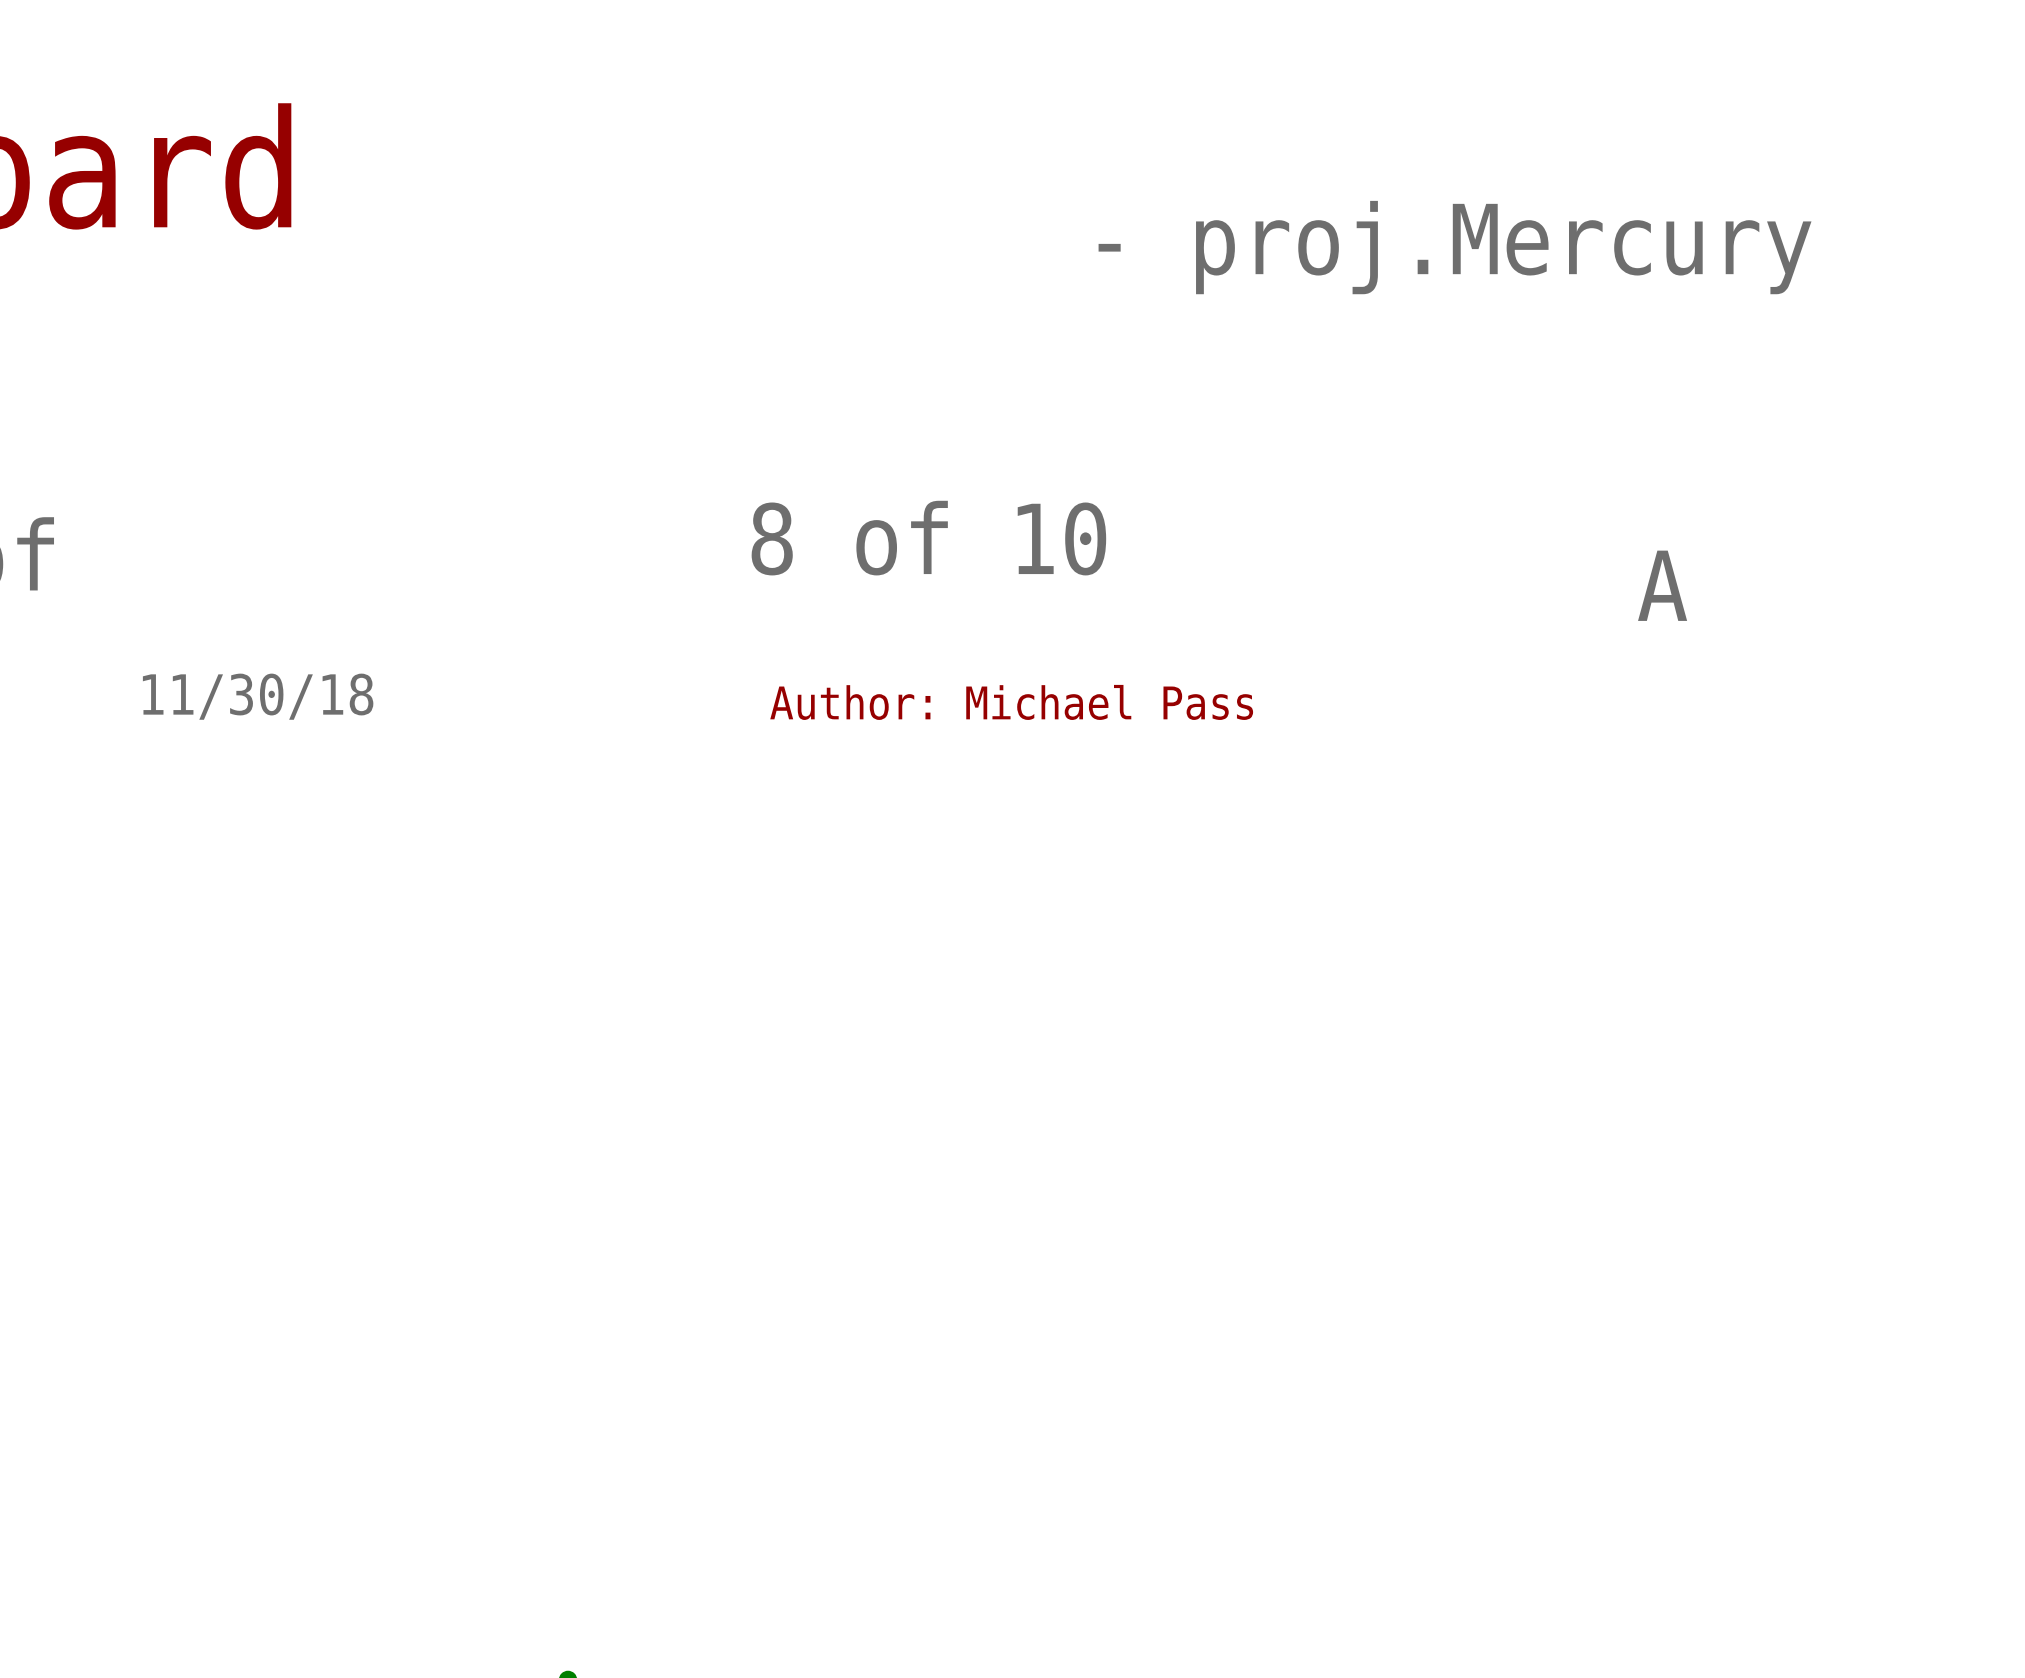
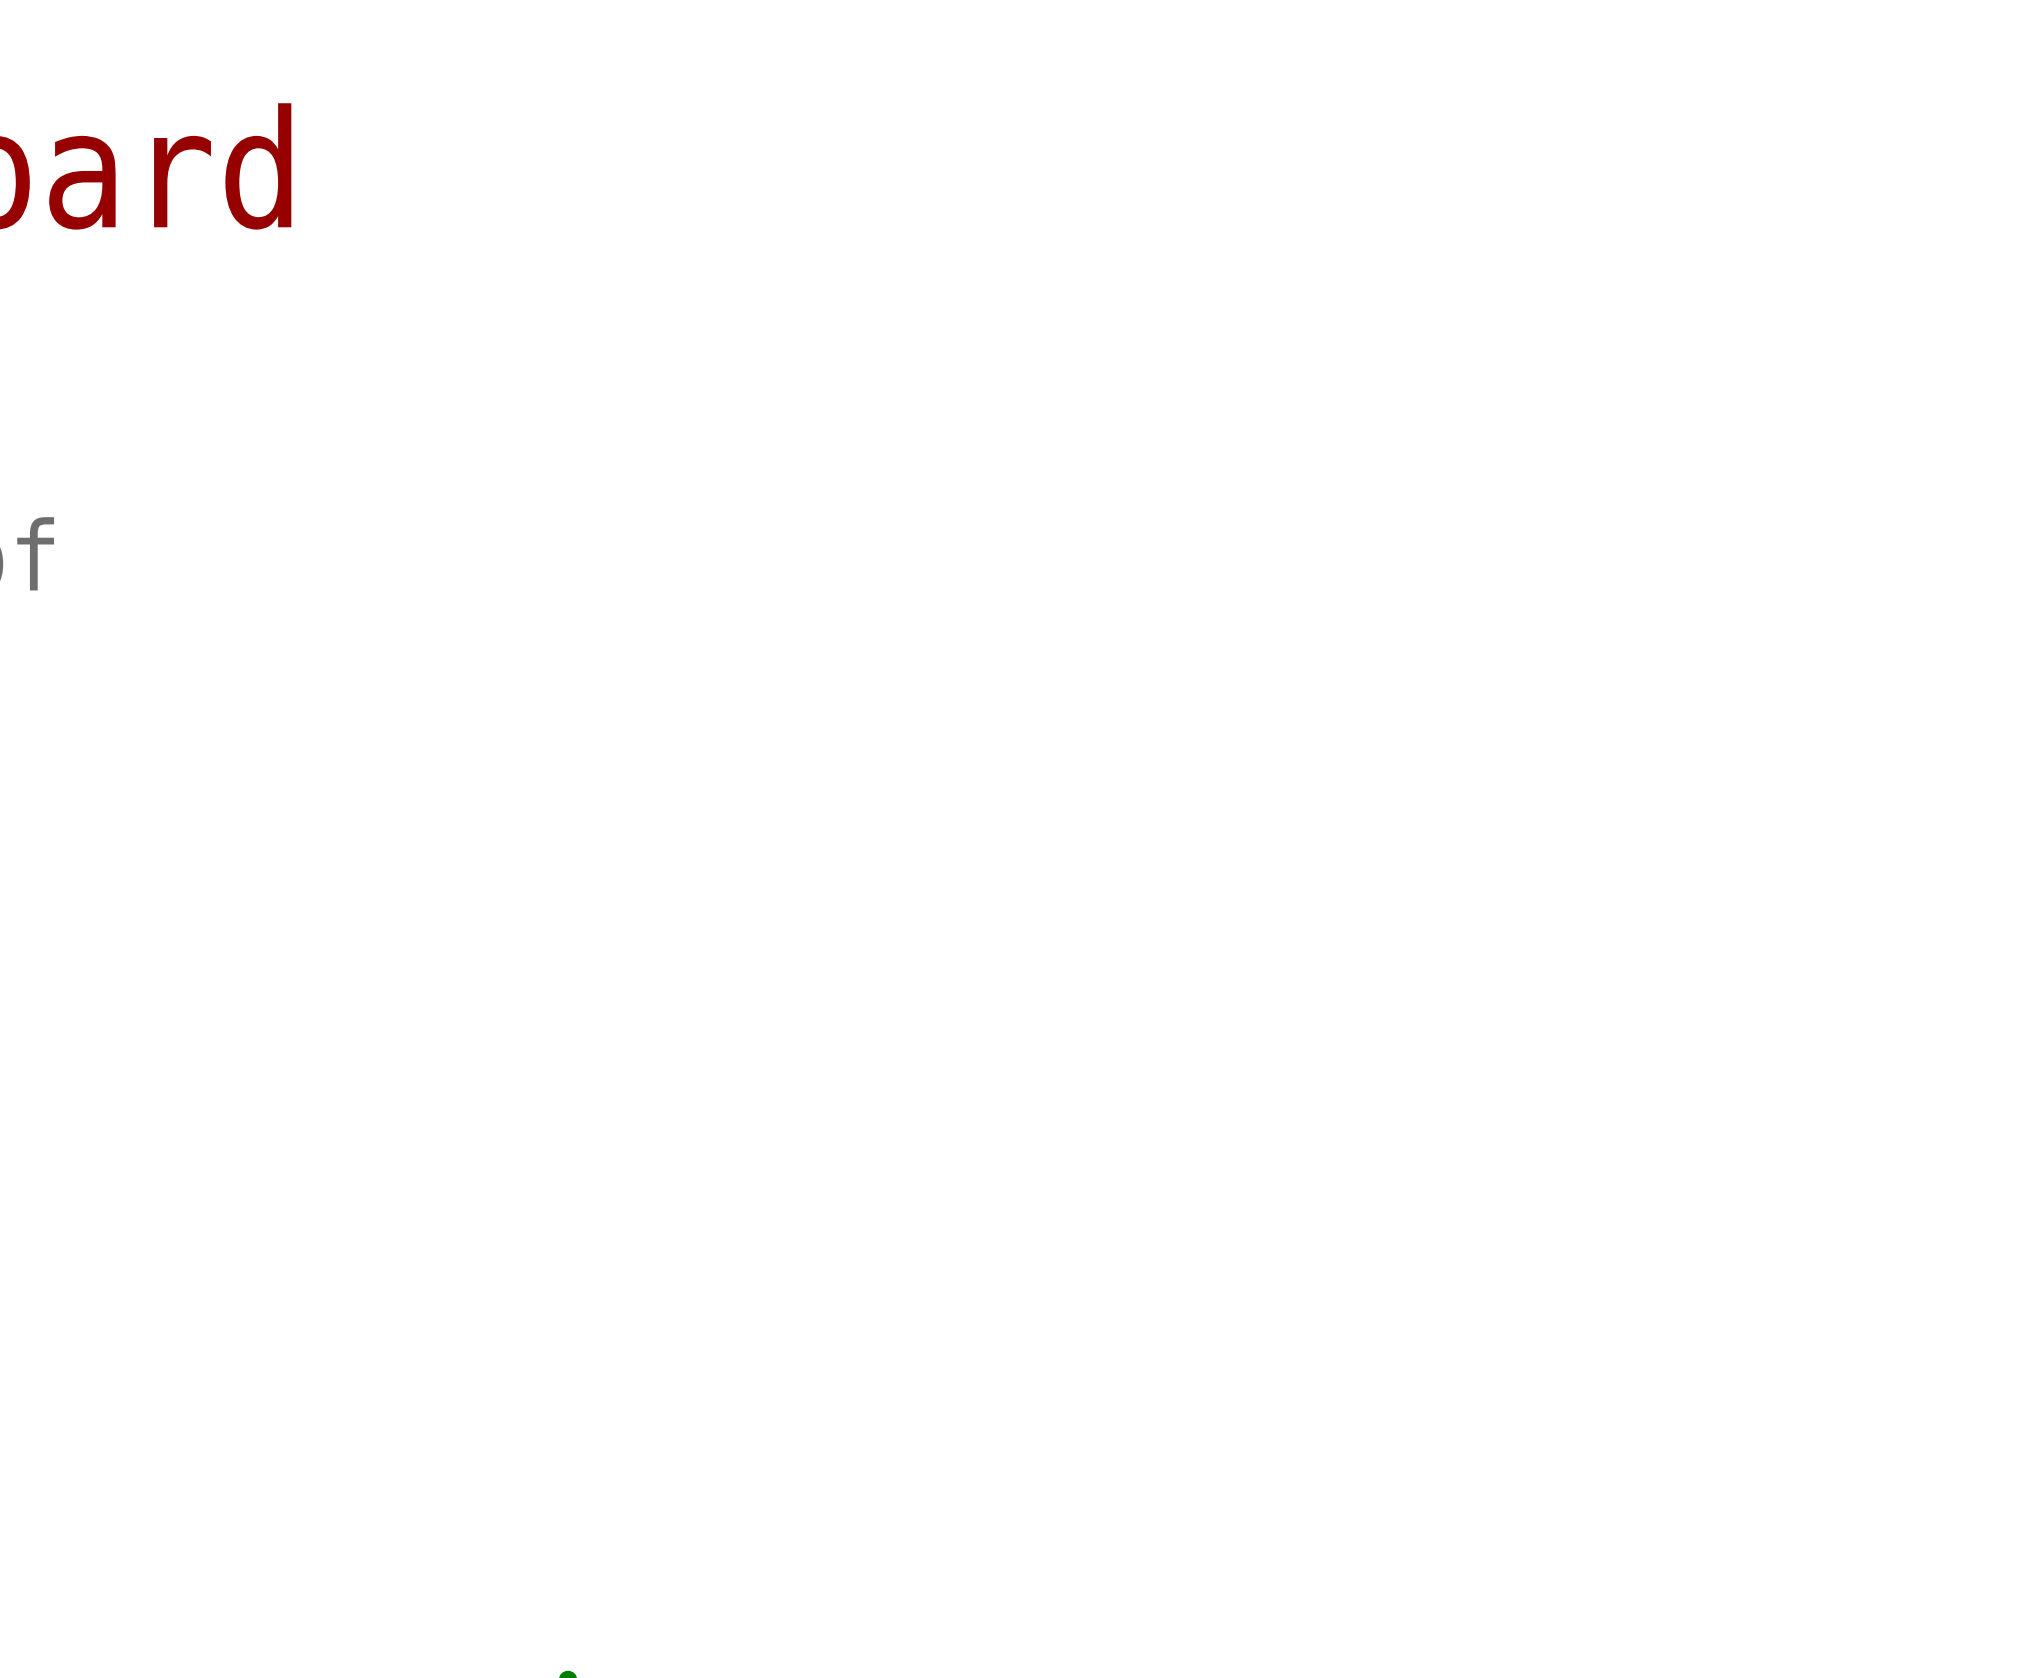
text: - proj.Mercury (1455, 247) -> none
text: 8 of 10 (928, 538) -> none
text: A (1662, 585) -> none
text: 11/30/18 (258, 696) -> none
text: Author: Michael Pass (1011, 702) -> none

